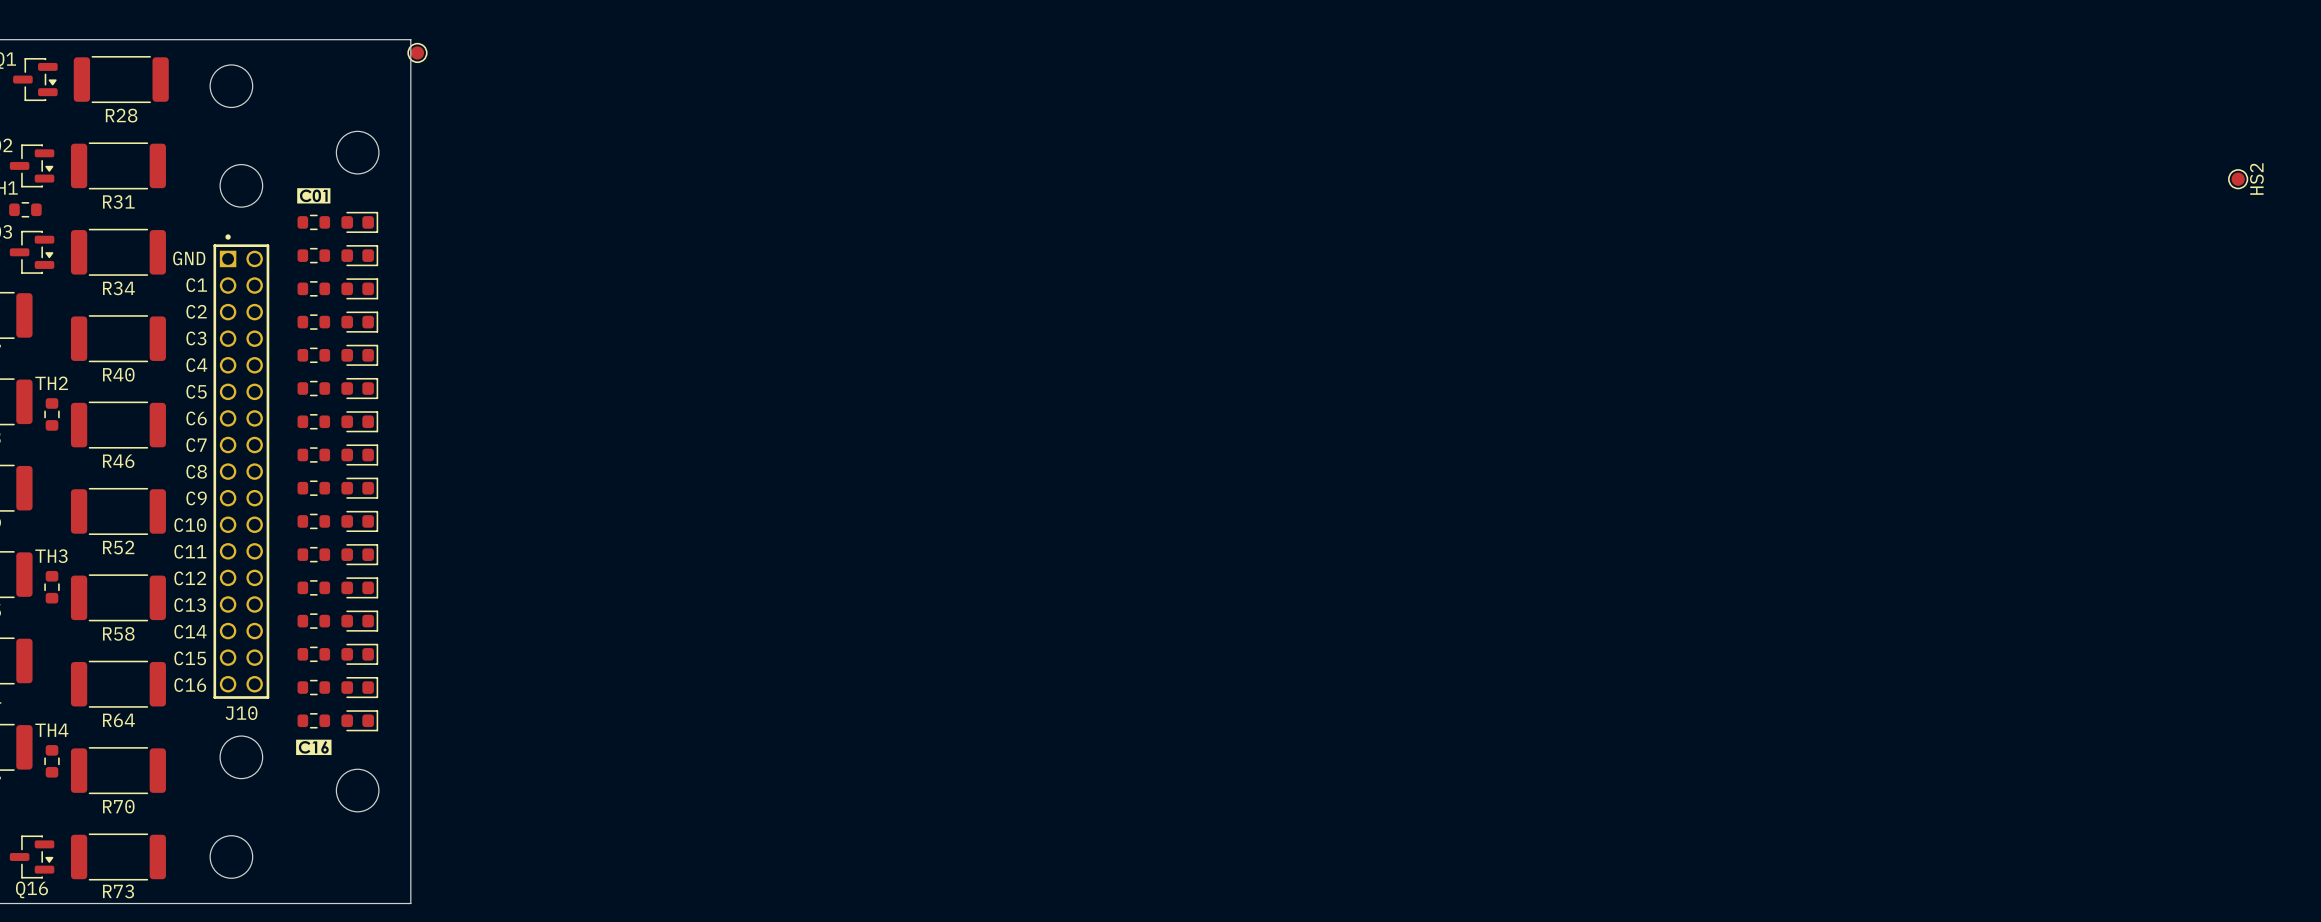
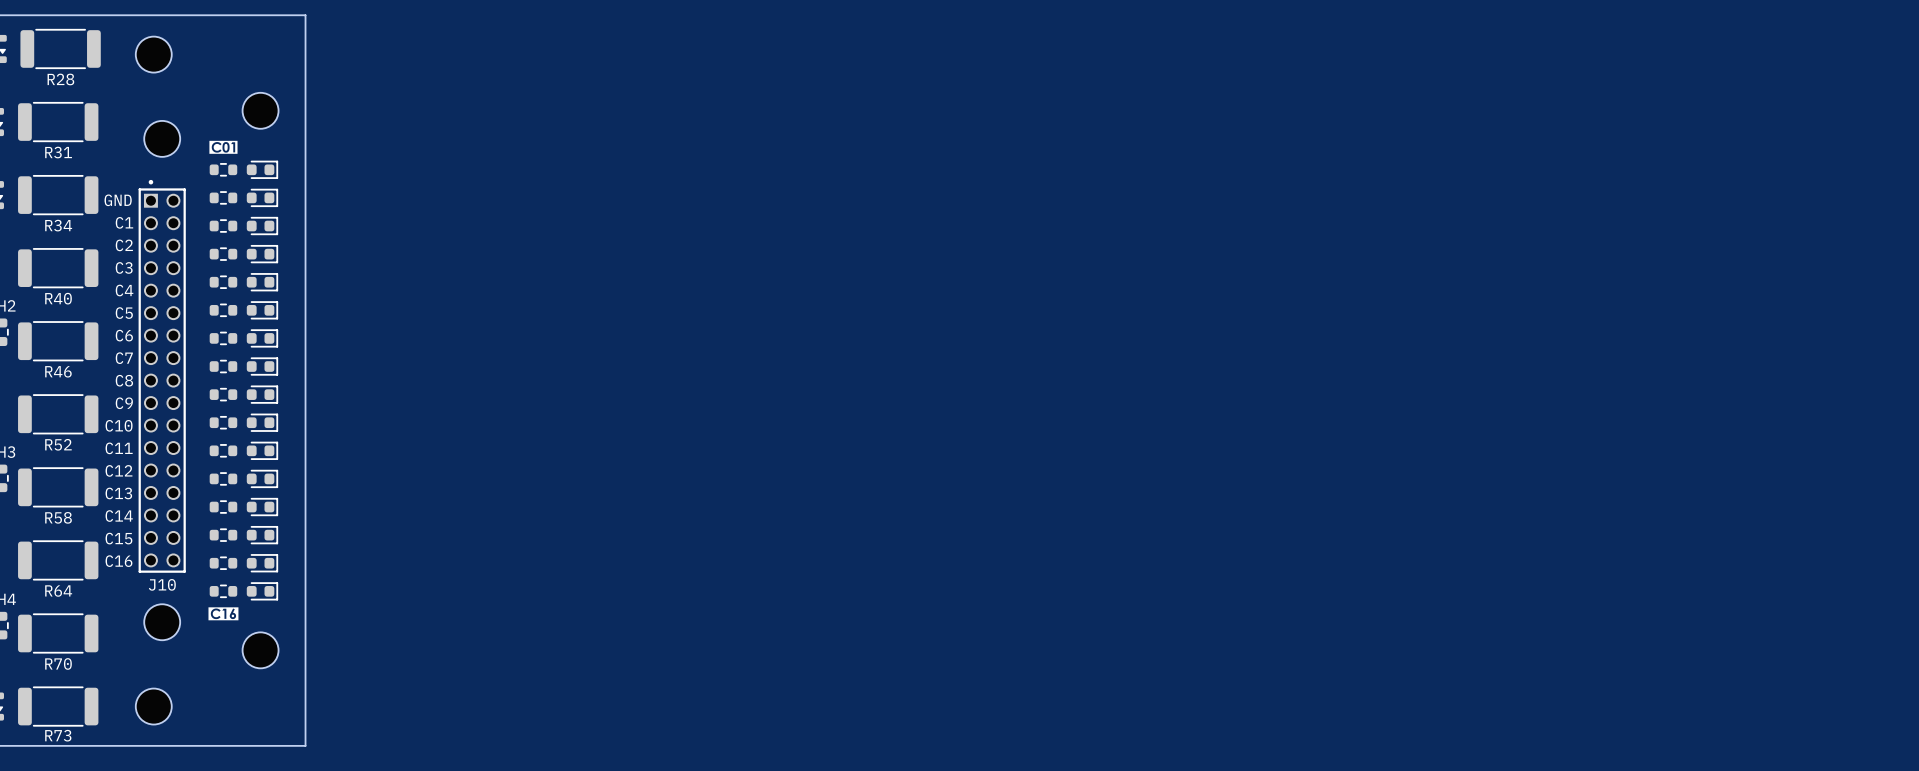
part: (417, 52) -> none
HS2: (2238, 179) -> none

